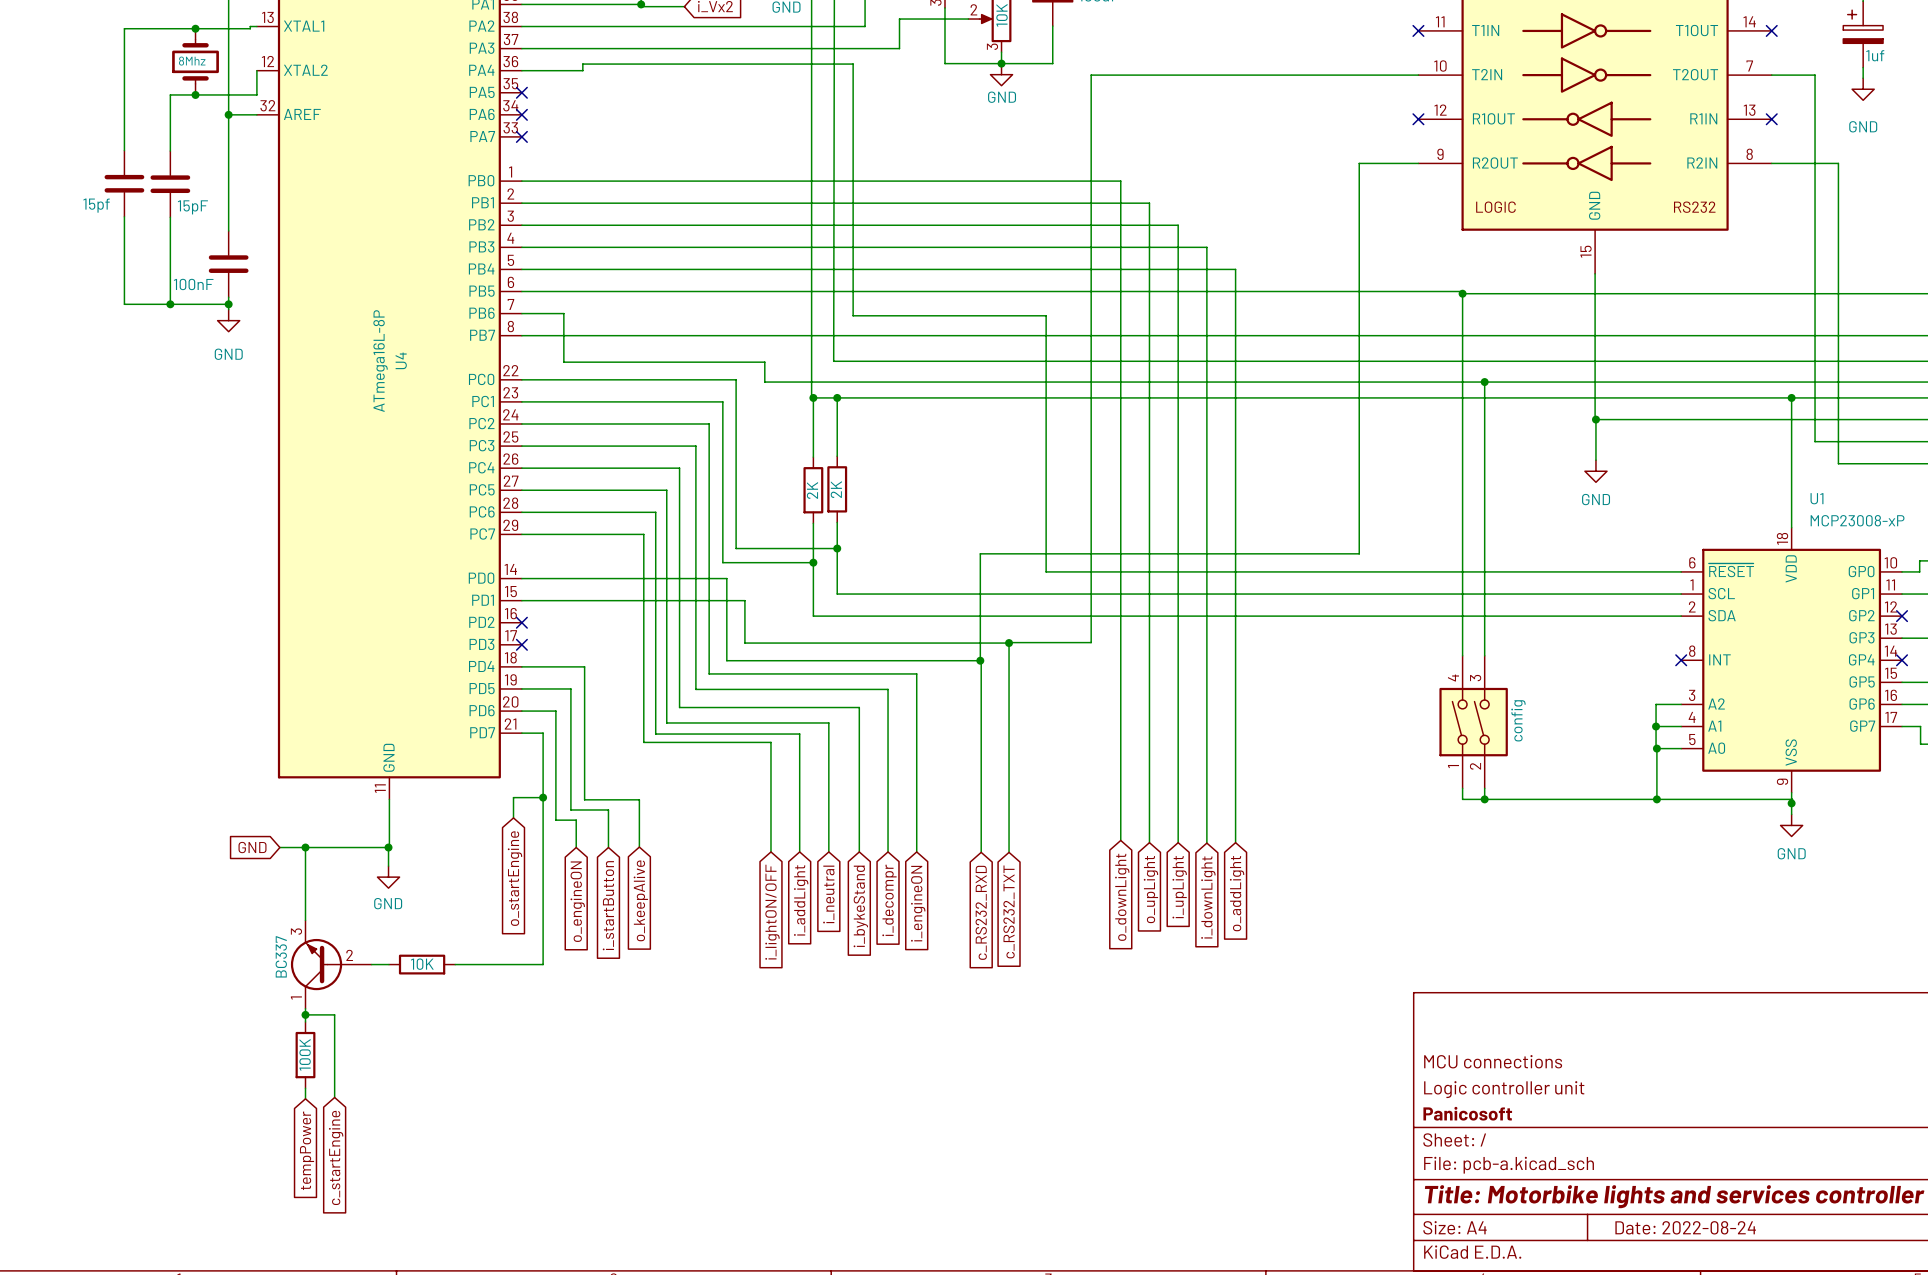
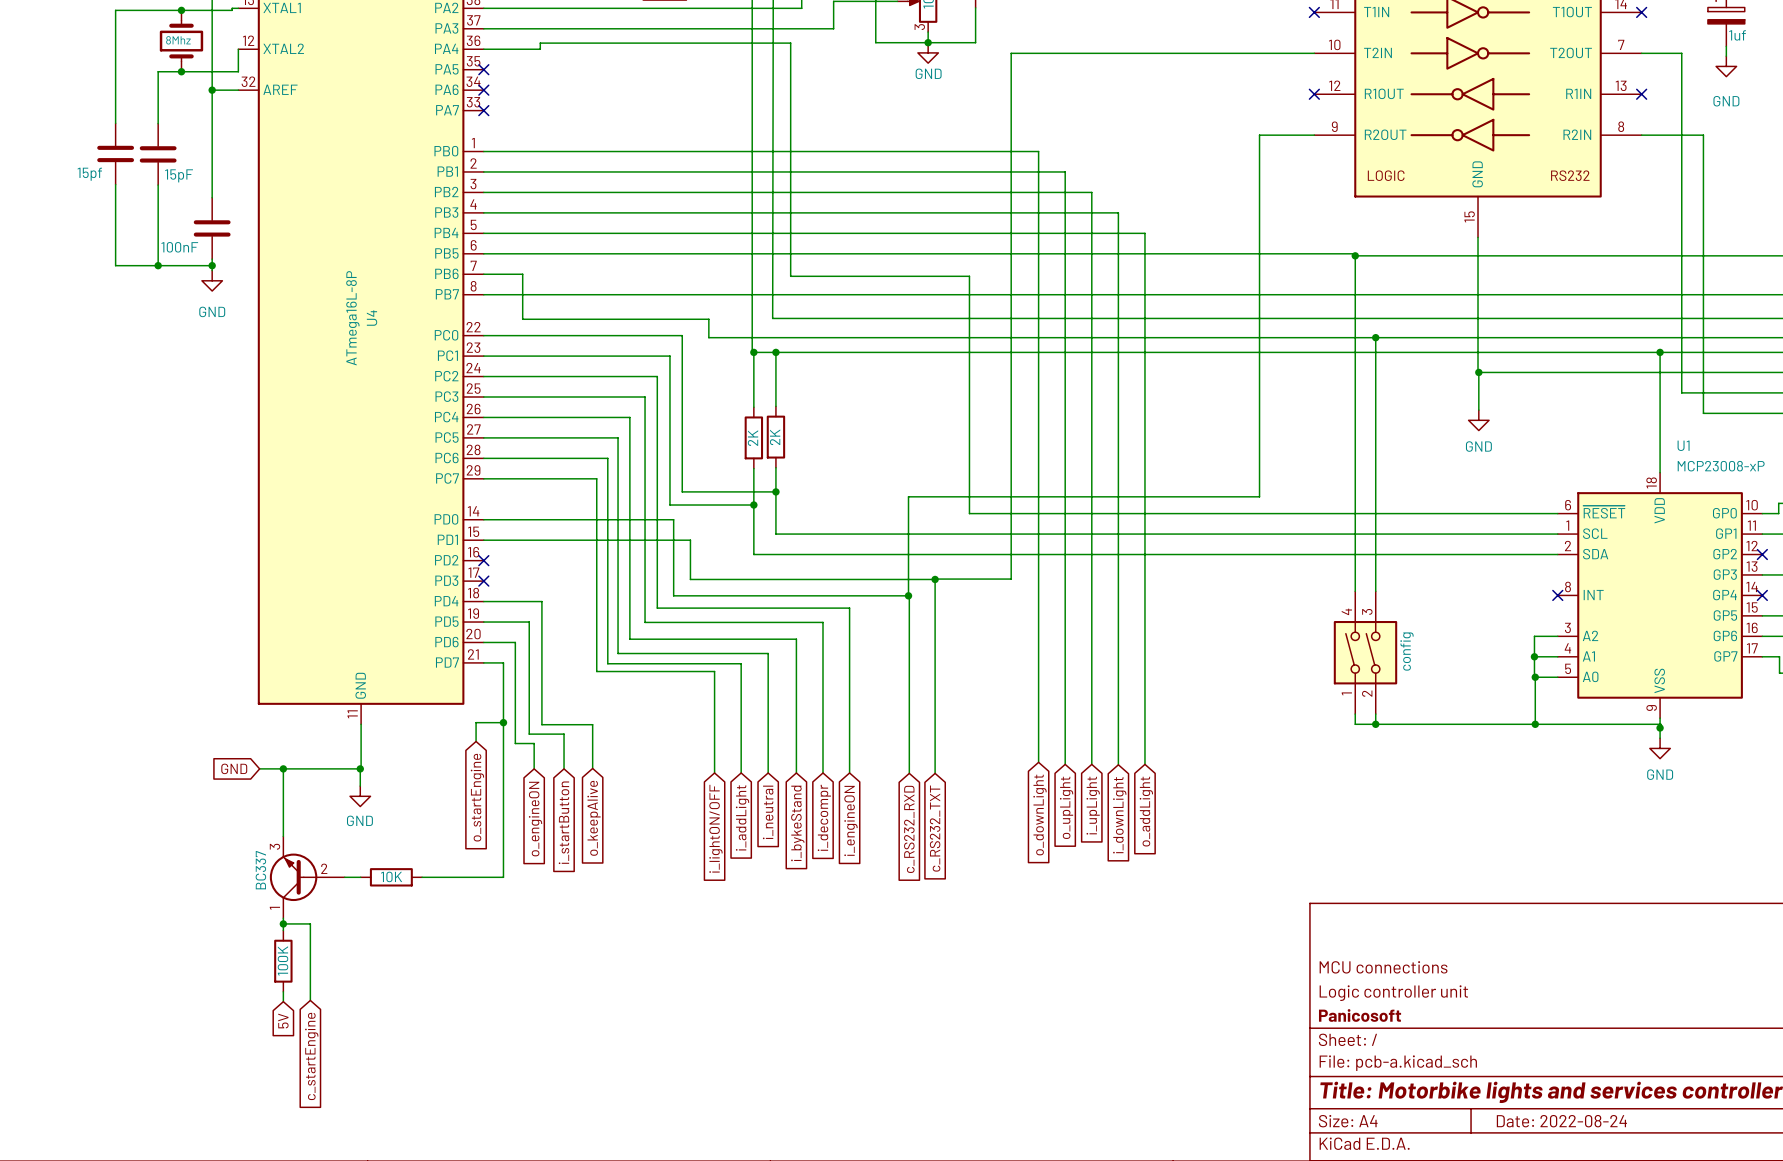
global label: tempPower (307, 1150) -> 5V (283, 1021)

